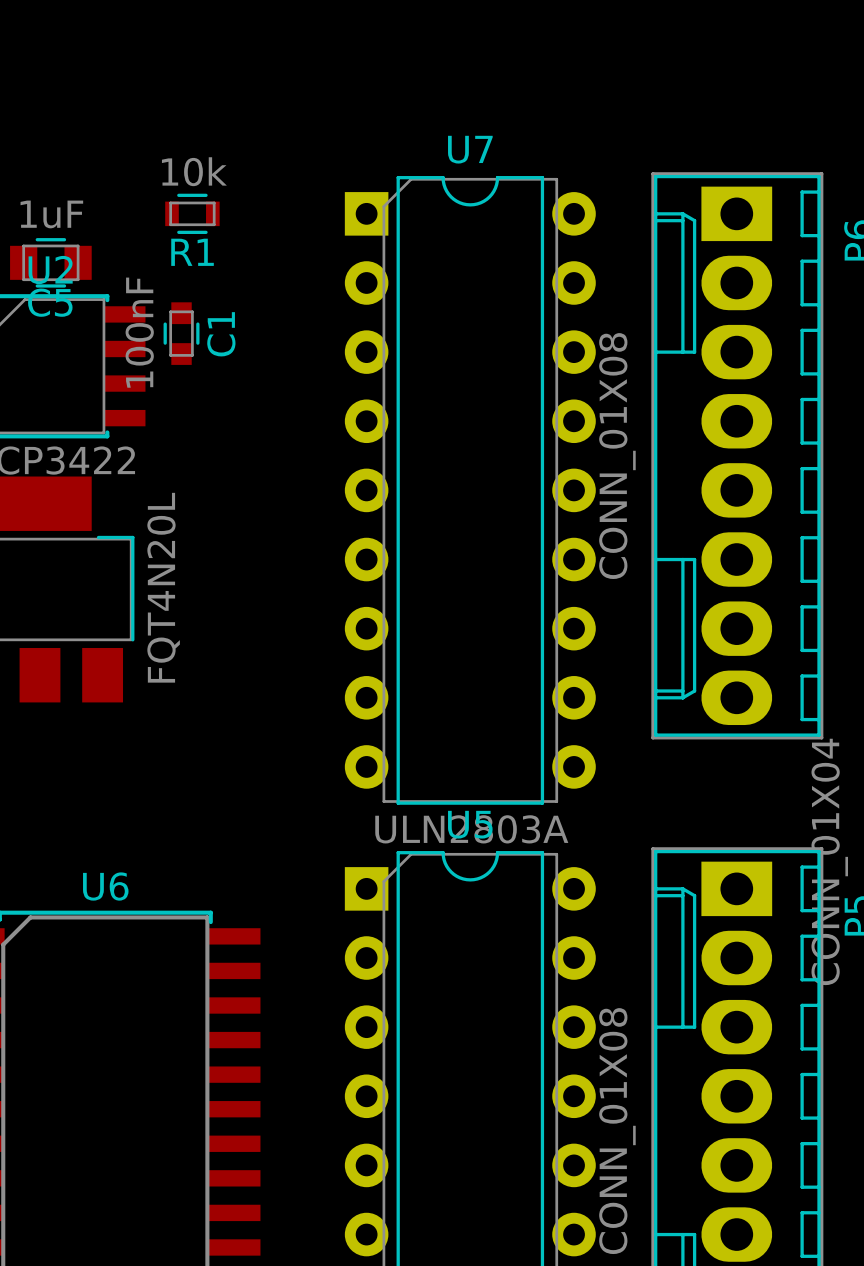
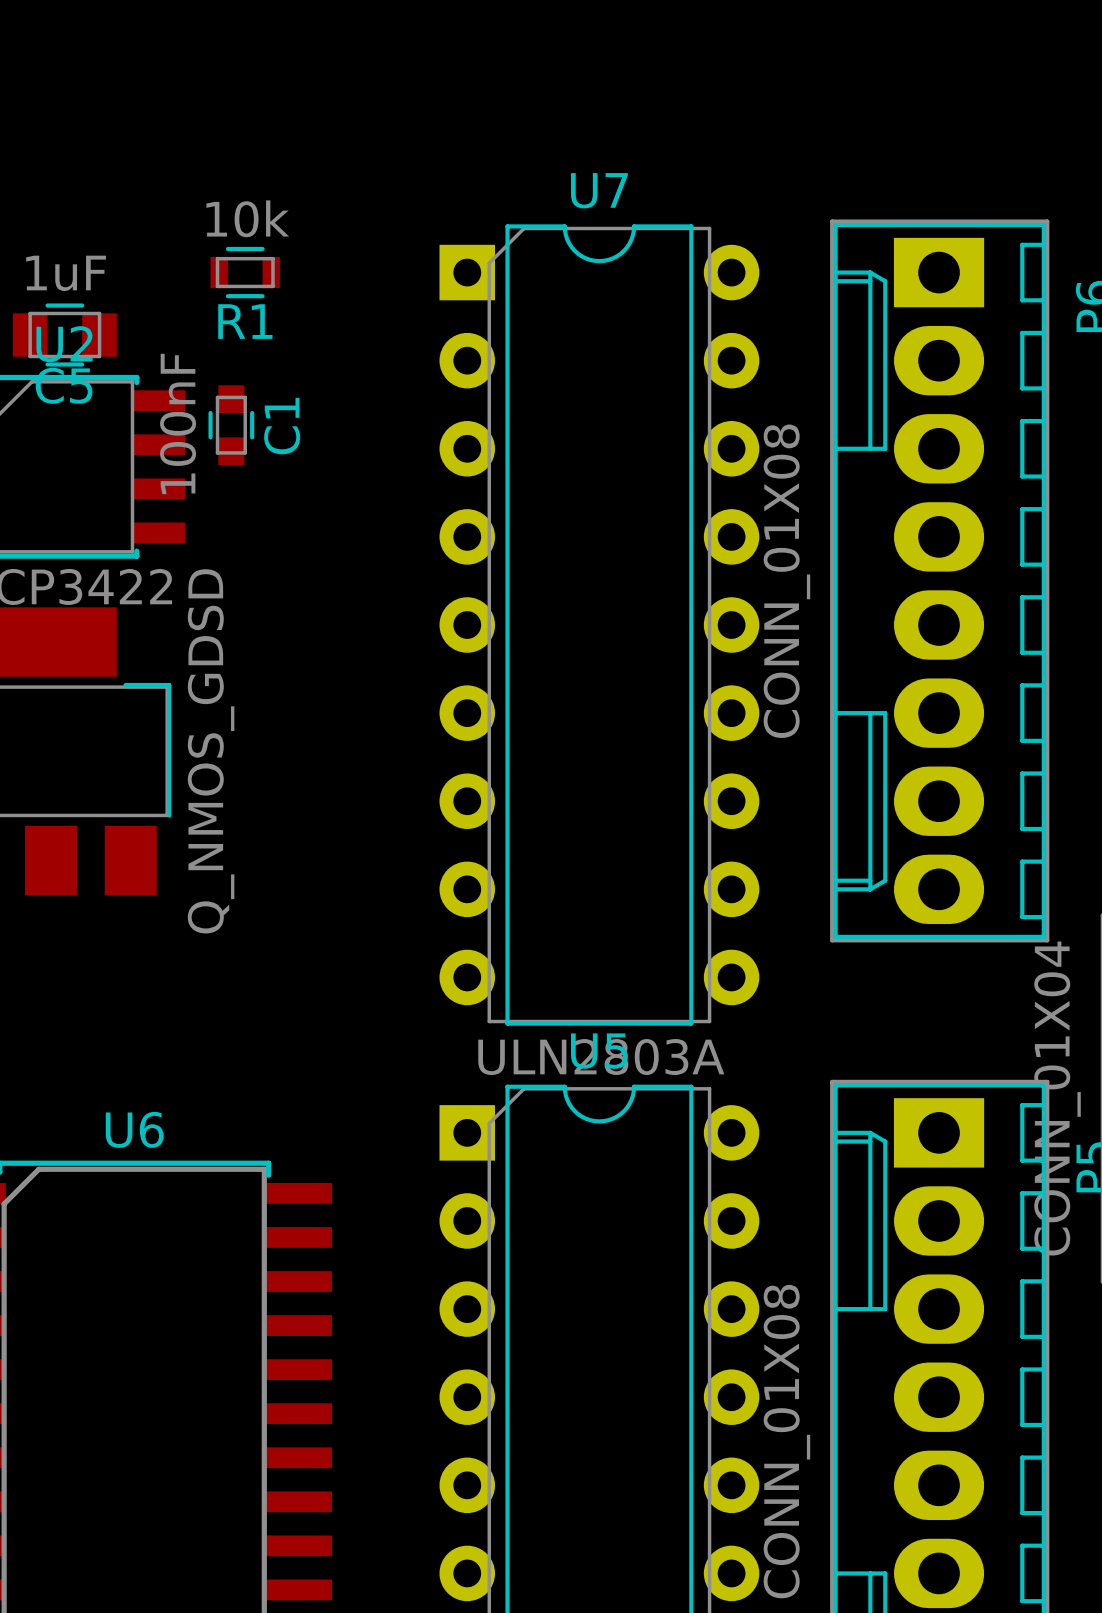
part value: FQT4N20L (163, 587) -> Q_NMOS_GDSD (211, 751)

